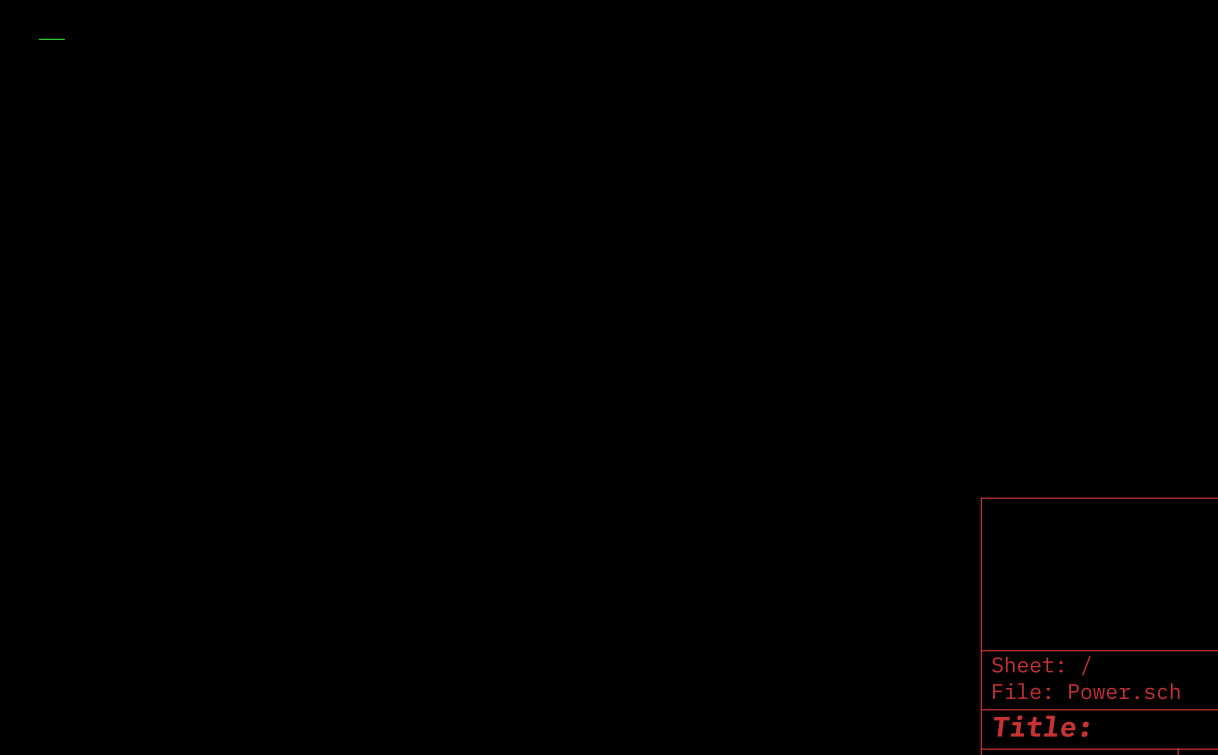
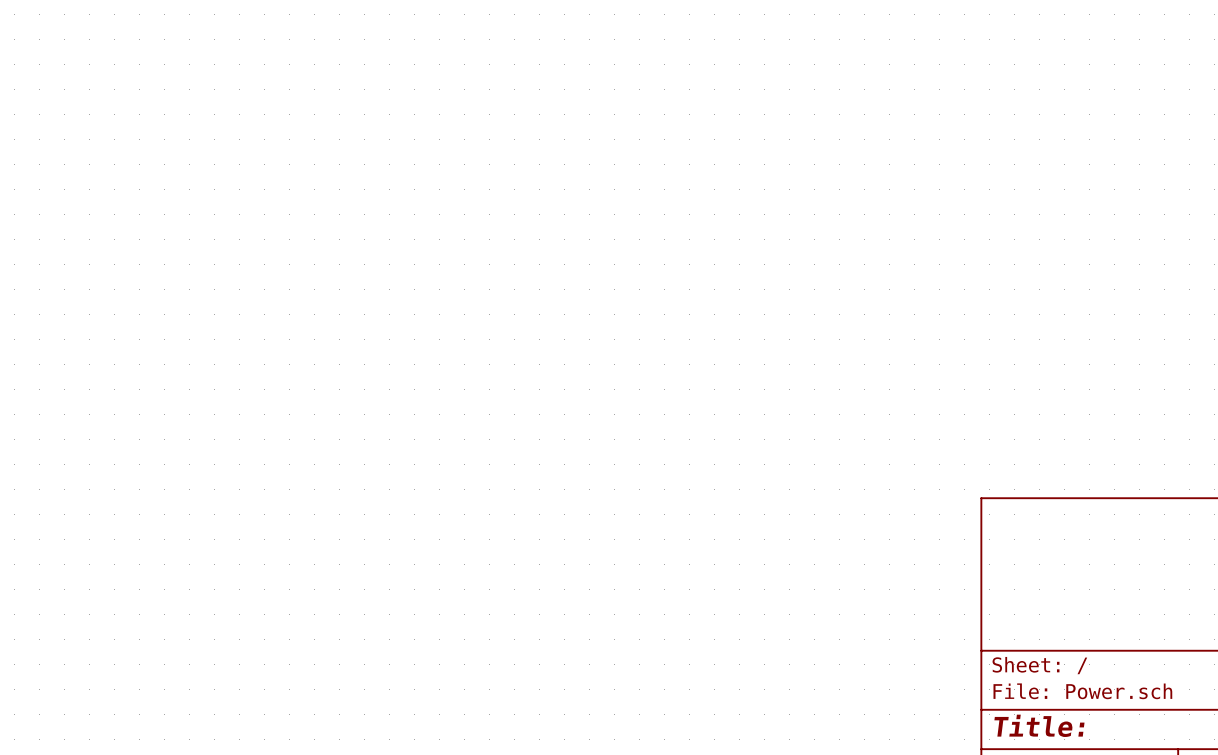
wire: (39, 39) (64, 39) -> none

